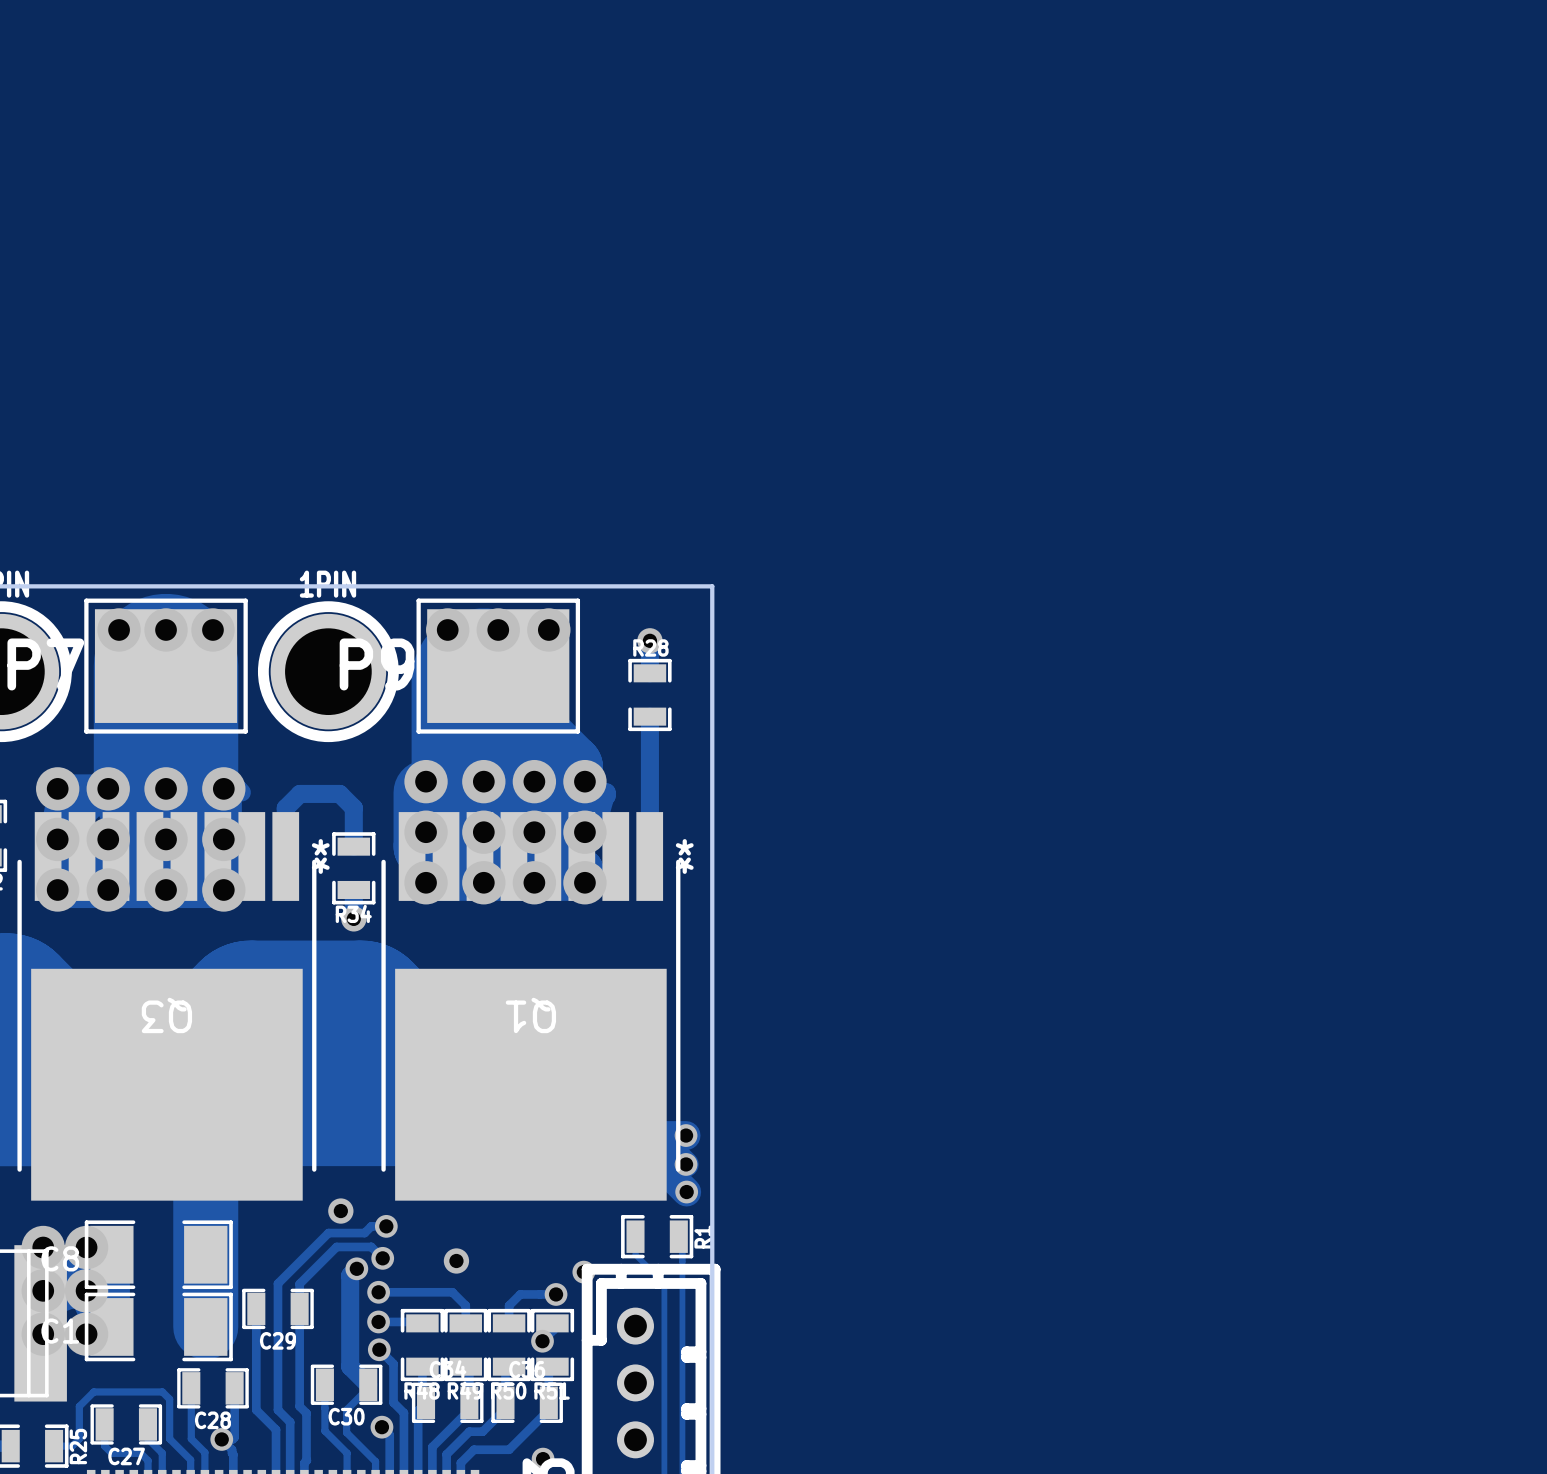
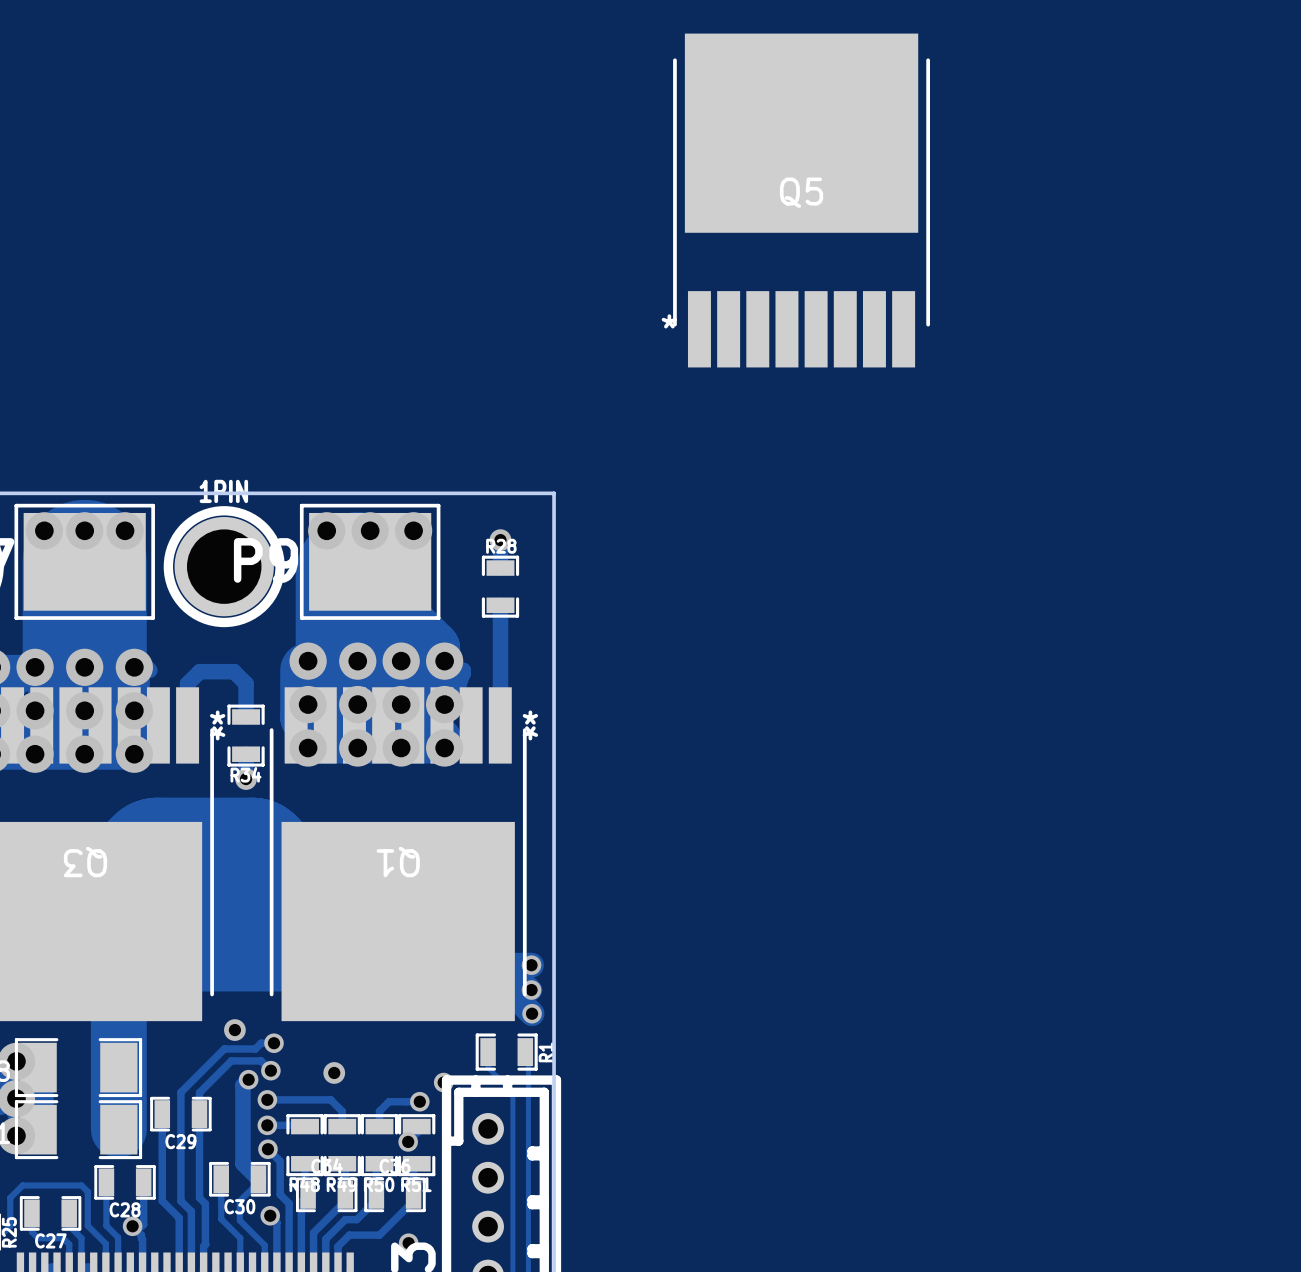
part: none -> (801, 200)

